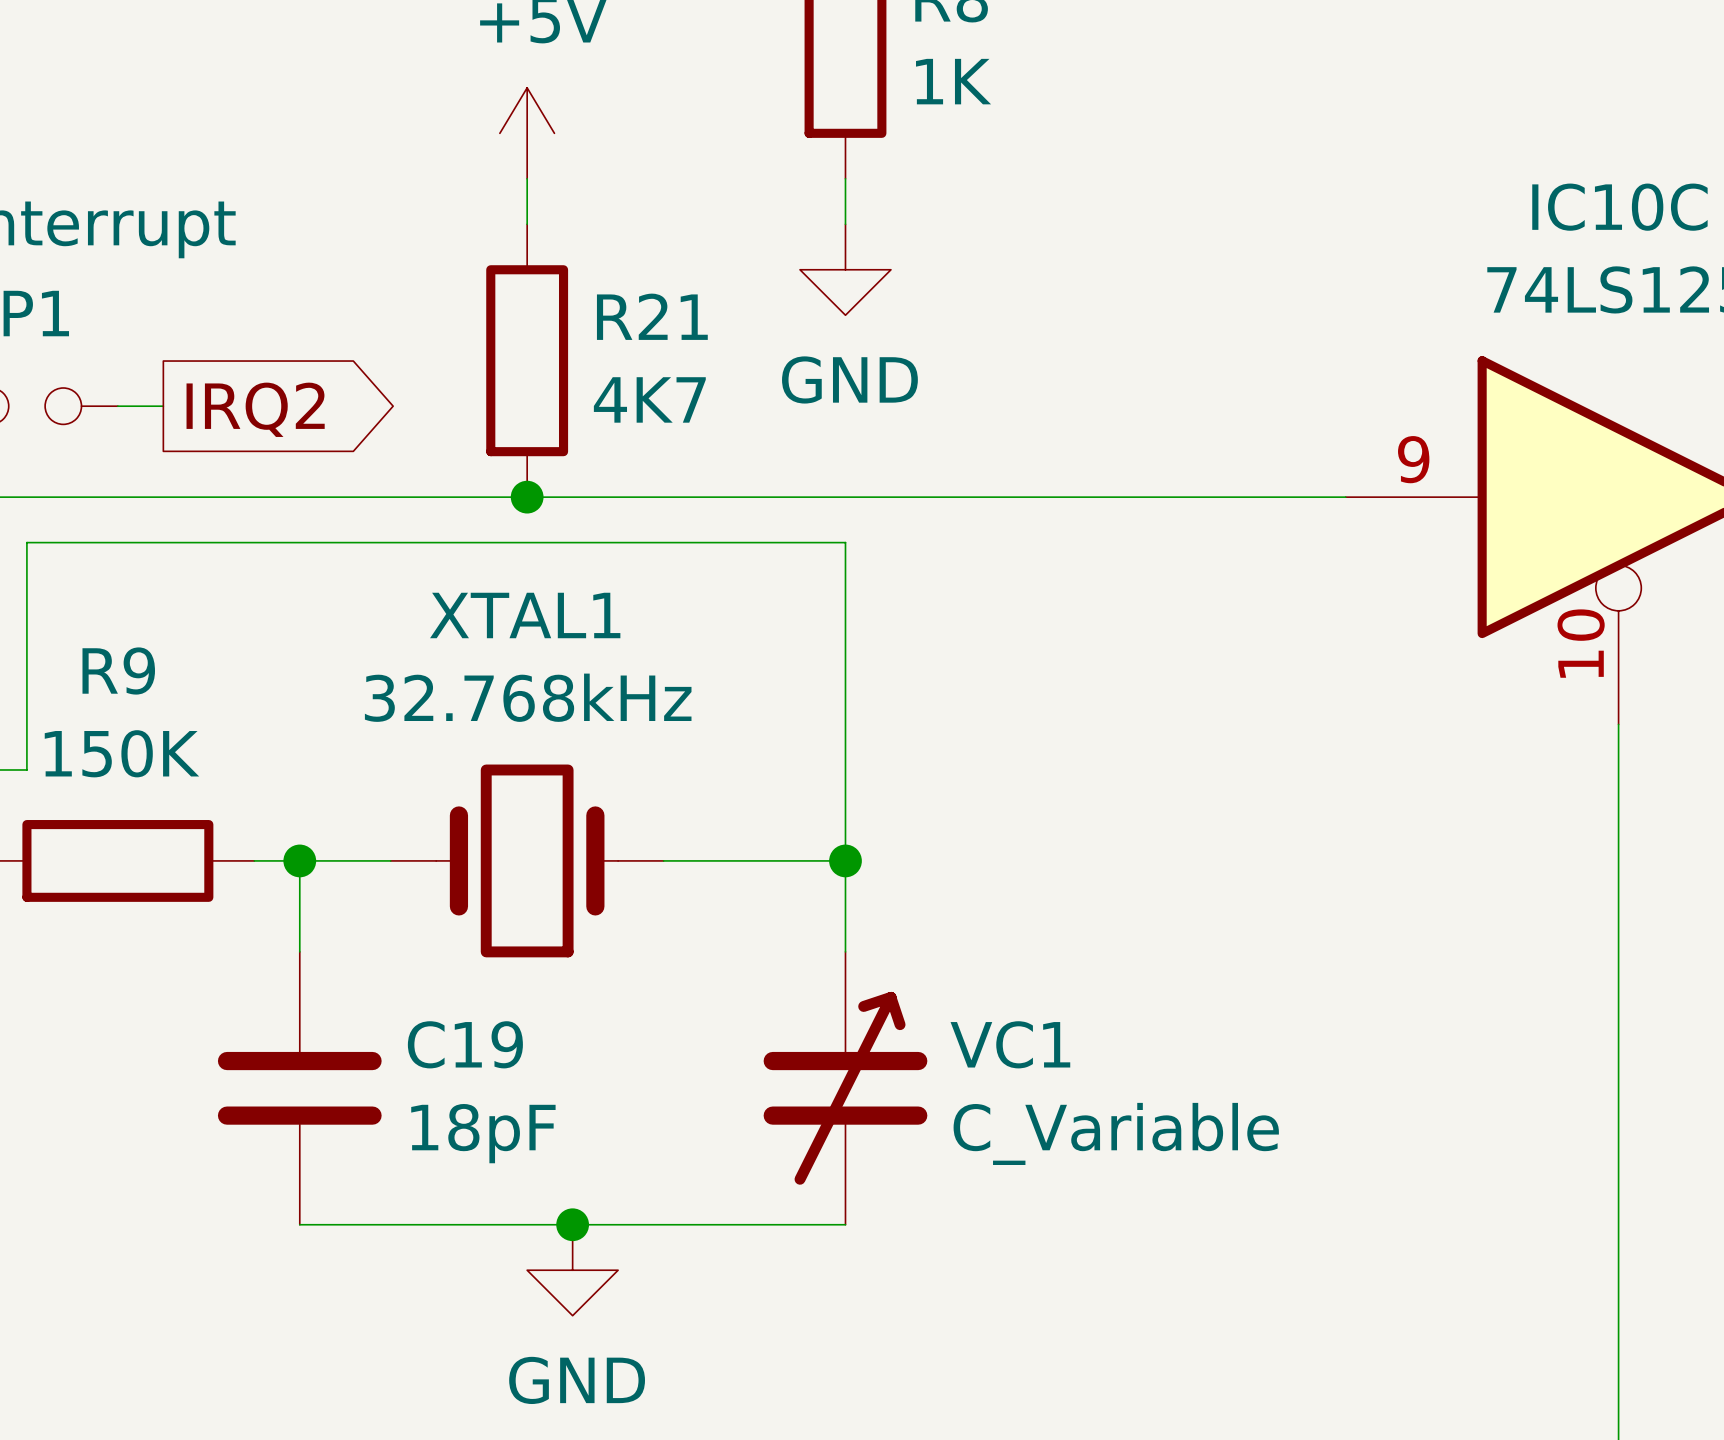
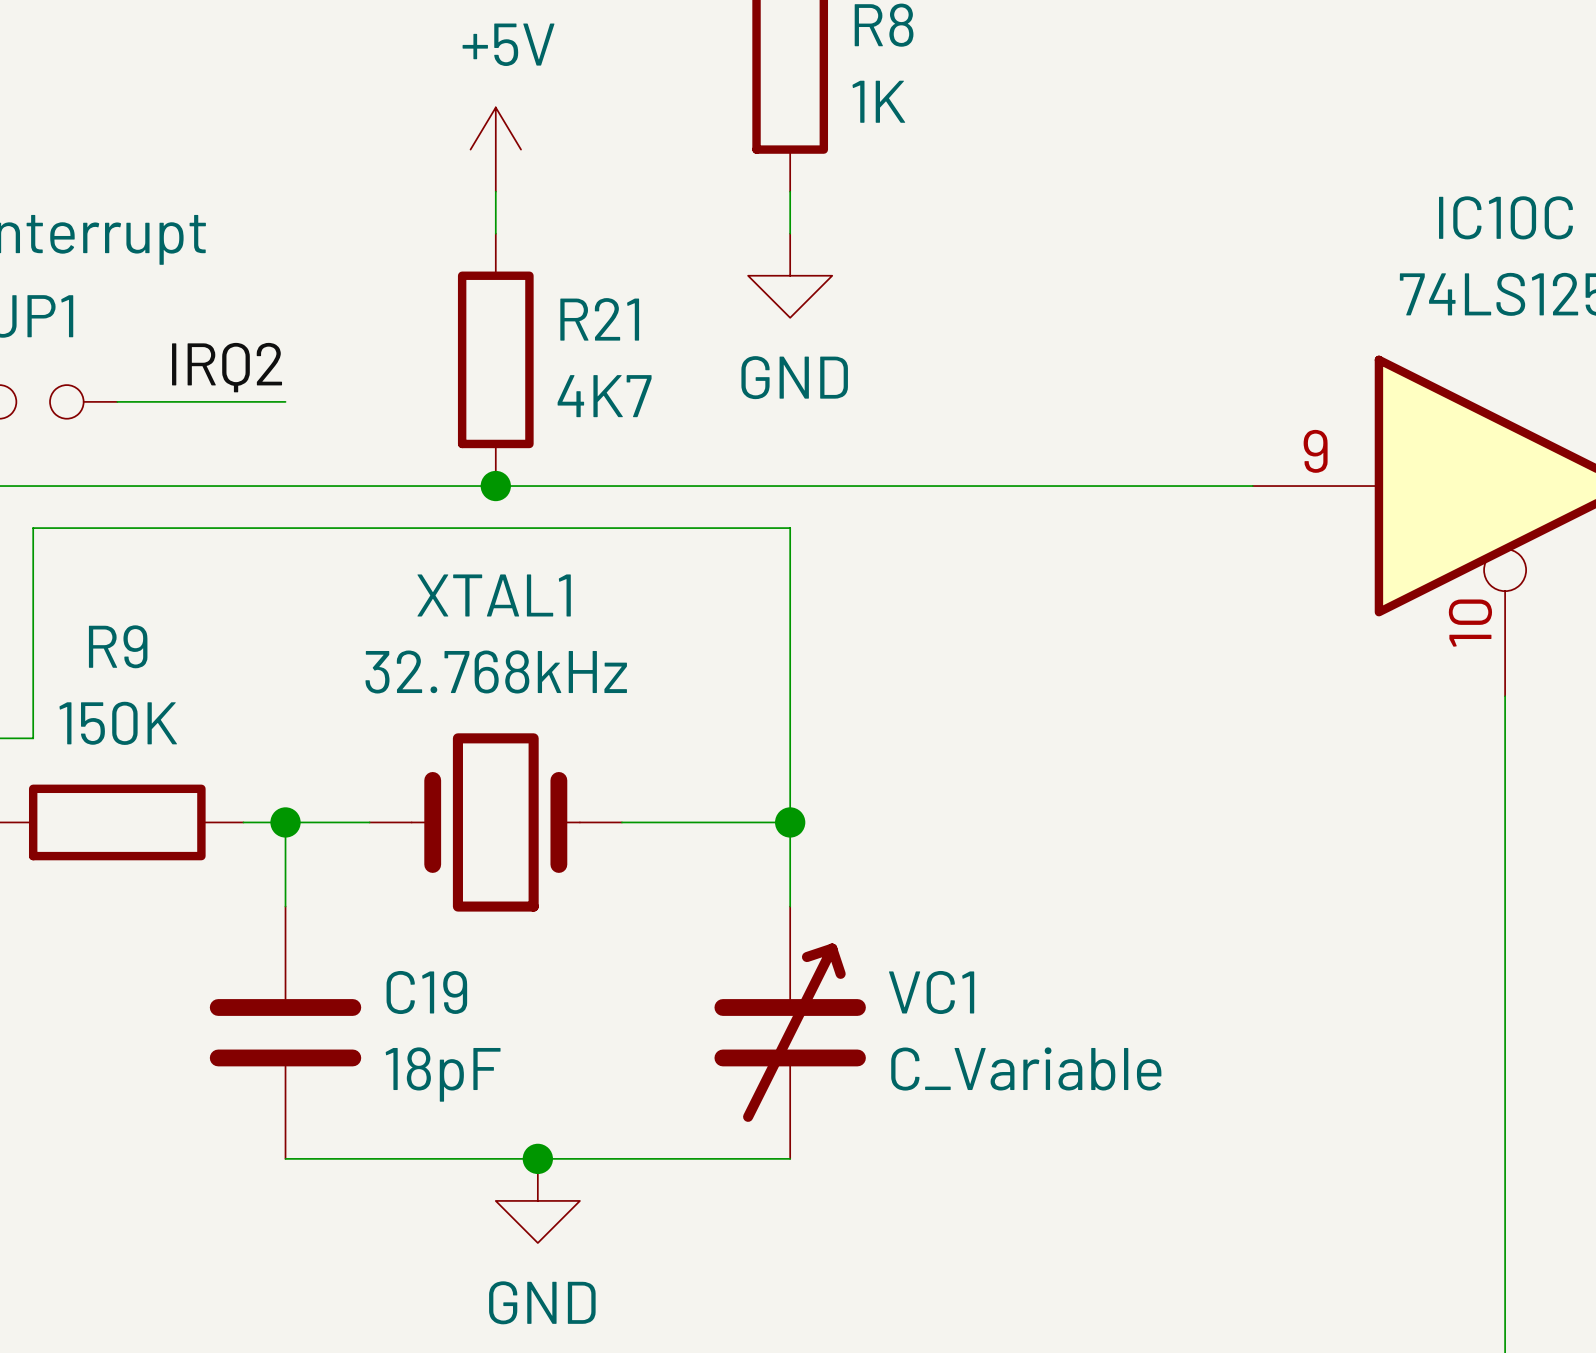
label: none -> IRQ2 (227, 367)
wire: none -> (159, 401) (285, 401)
global label: IRQ2 (255, 409) -> none

